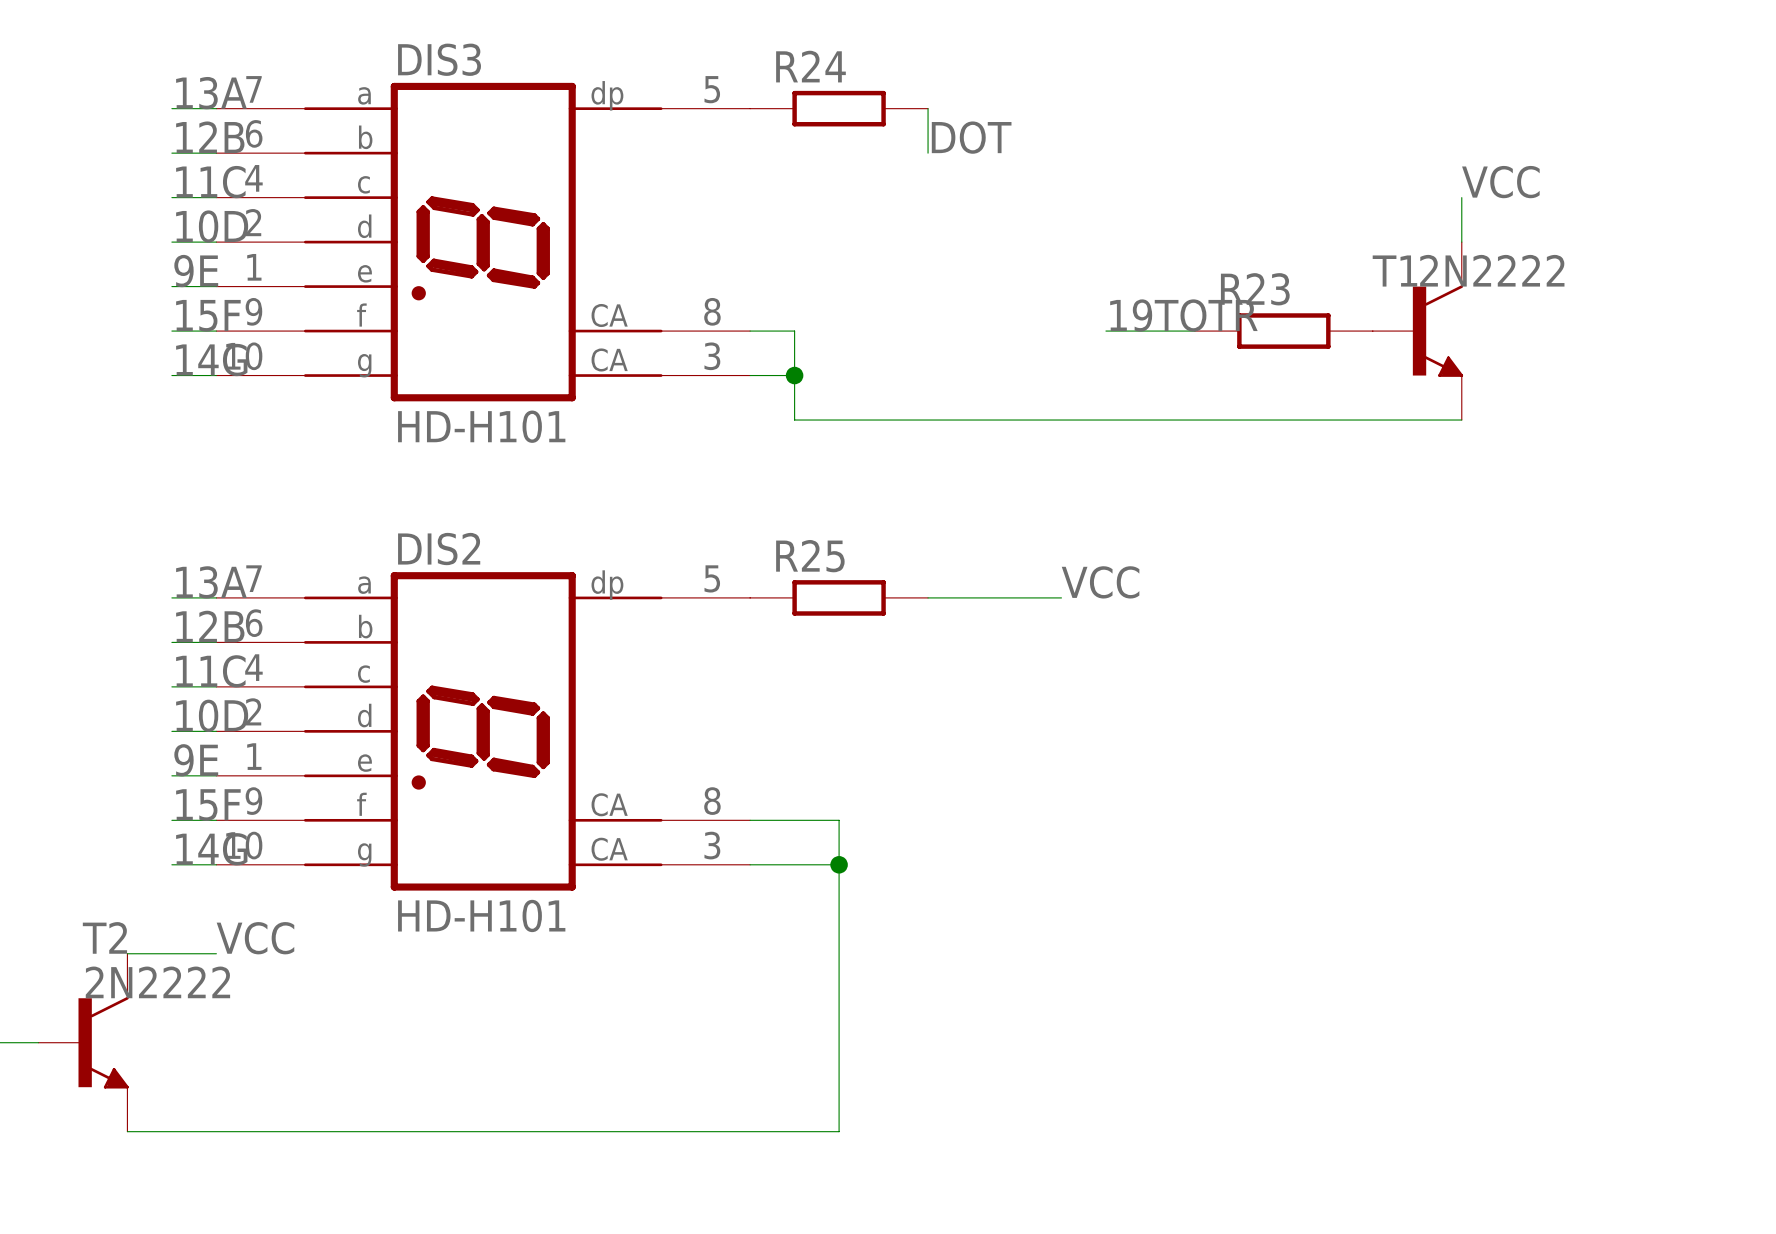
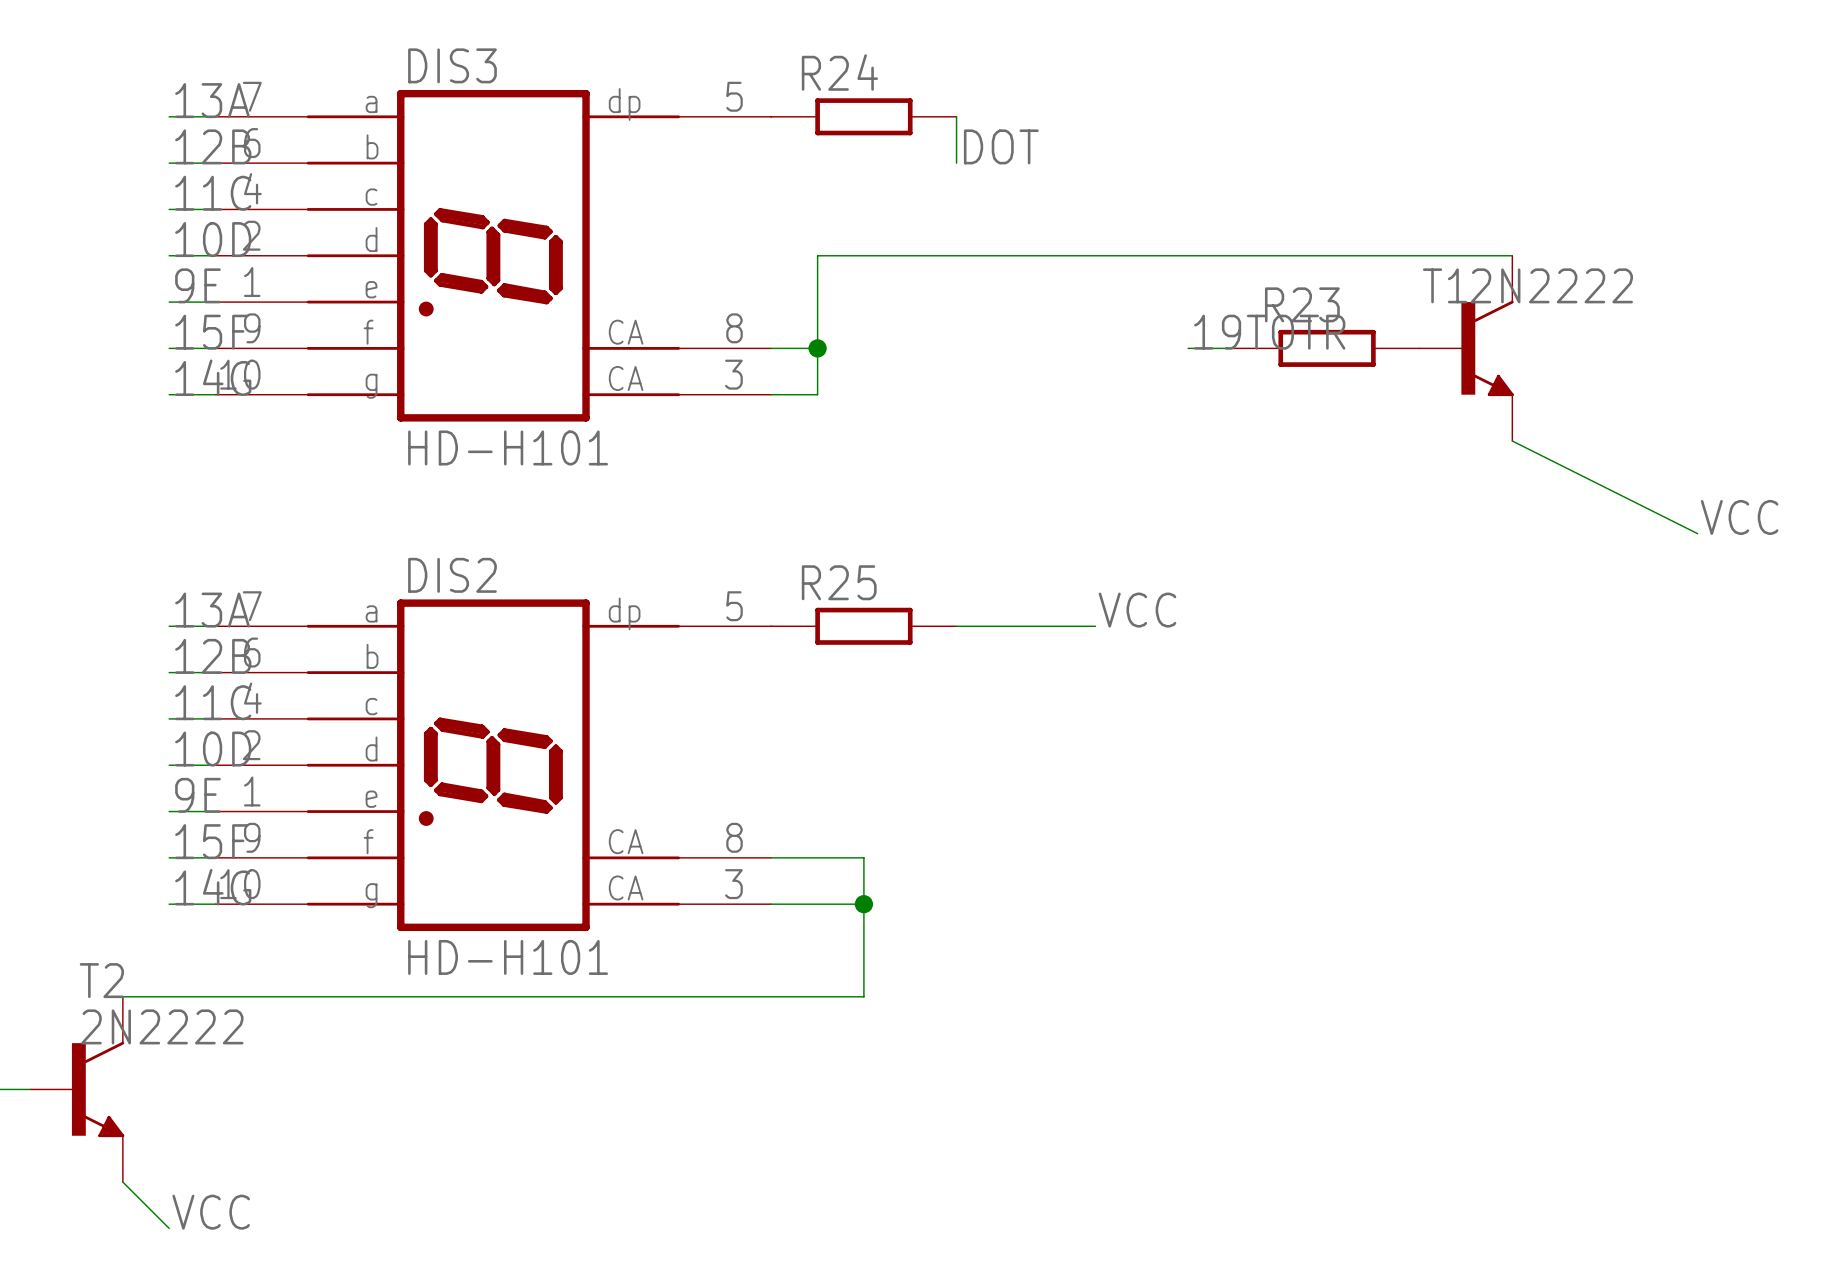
label position: VCC (1500, 182) -> VCC (1739, 517)
wire: (1461, 197) (1461, 242) -> (817, 348) (817, 255) (1512, 255)
label position: 19TOTR (1183, 315) -> 19TOTR (1269, 332)
wire: (1105, 331) (1150, 331) -> none
wire: (794, 375) (794, 420) (1461, 420) -> (1697, 533) (1512, 441)
junction position: (794, 375) -> (817, 348)
label position: VCC (255, 938) -> VCC (211, 1212)
wire: (839, 953) (839, 1131) (127, 1131) -> (863, 996) (215, 996)
wire: none -> (122, 1182) (169, 1228)

